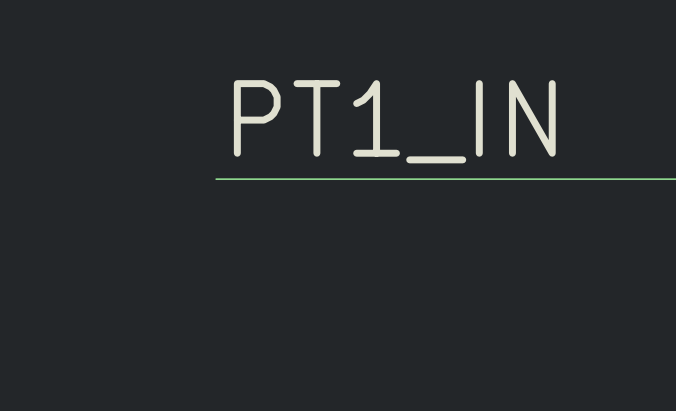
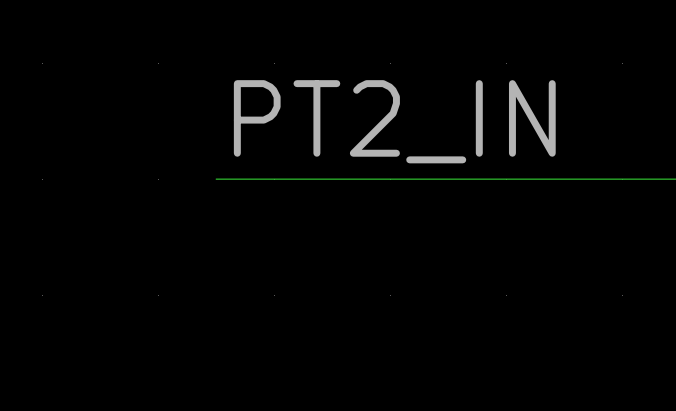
label: PT1_IN (394, 121) -> PT2_IN (394, 121)

